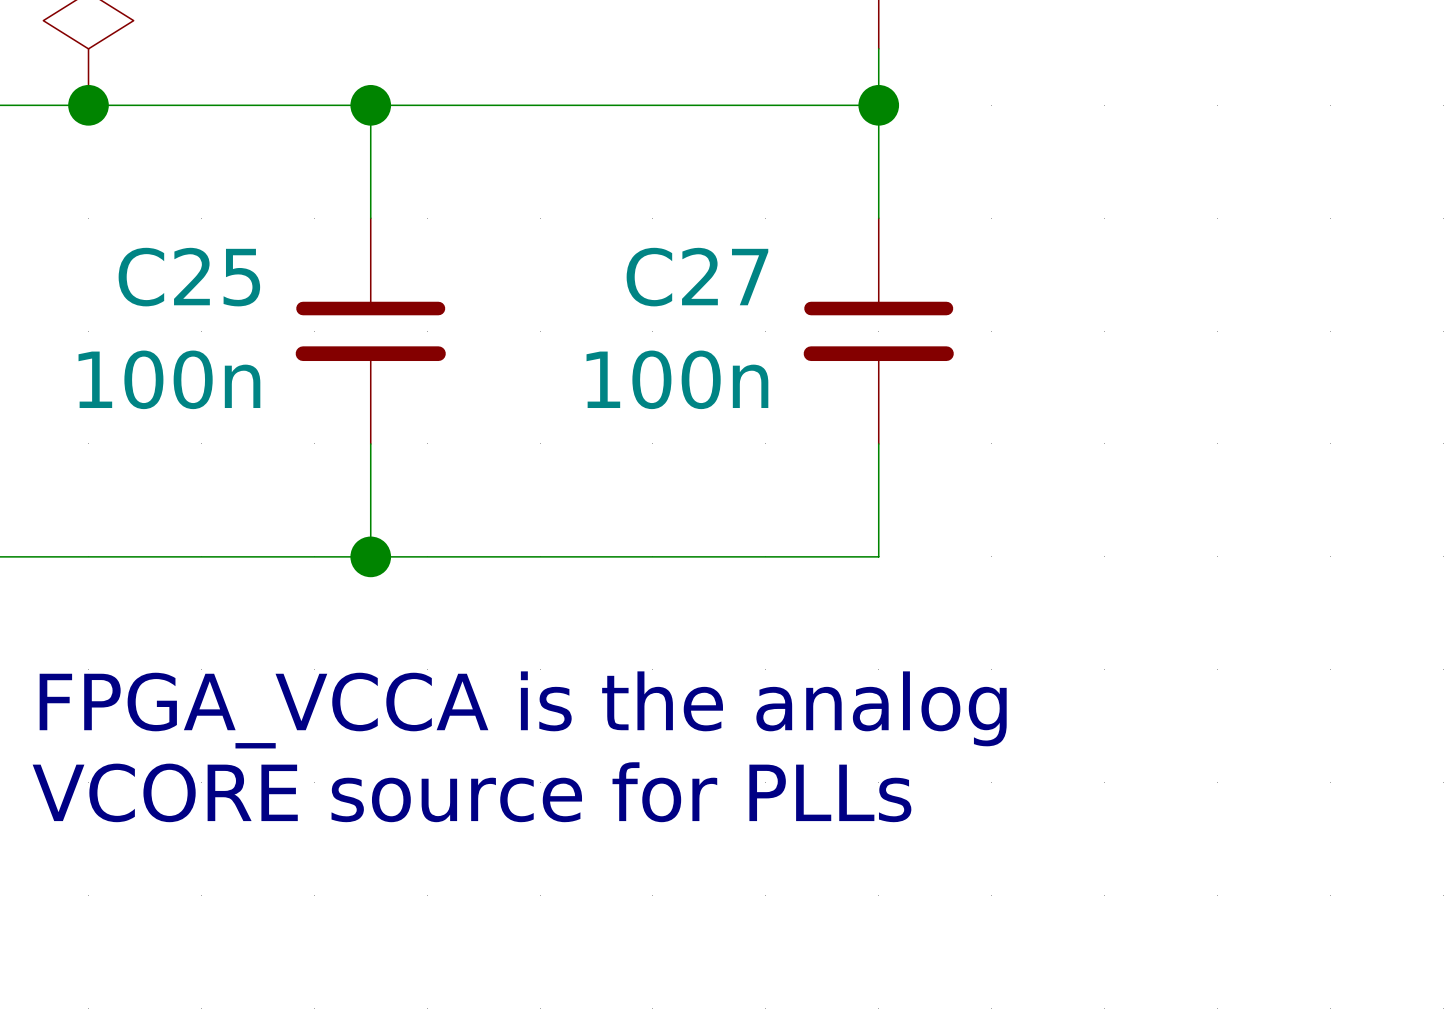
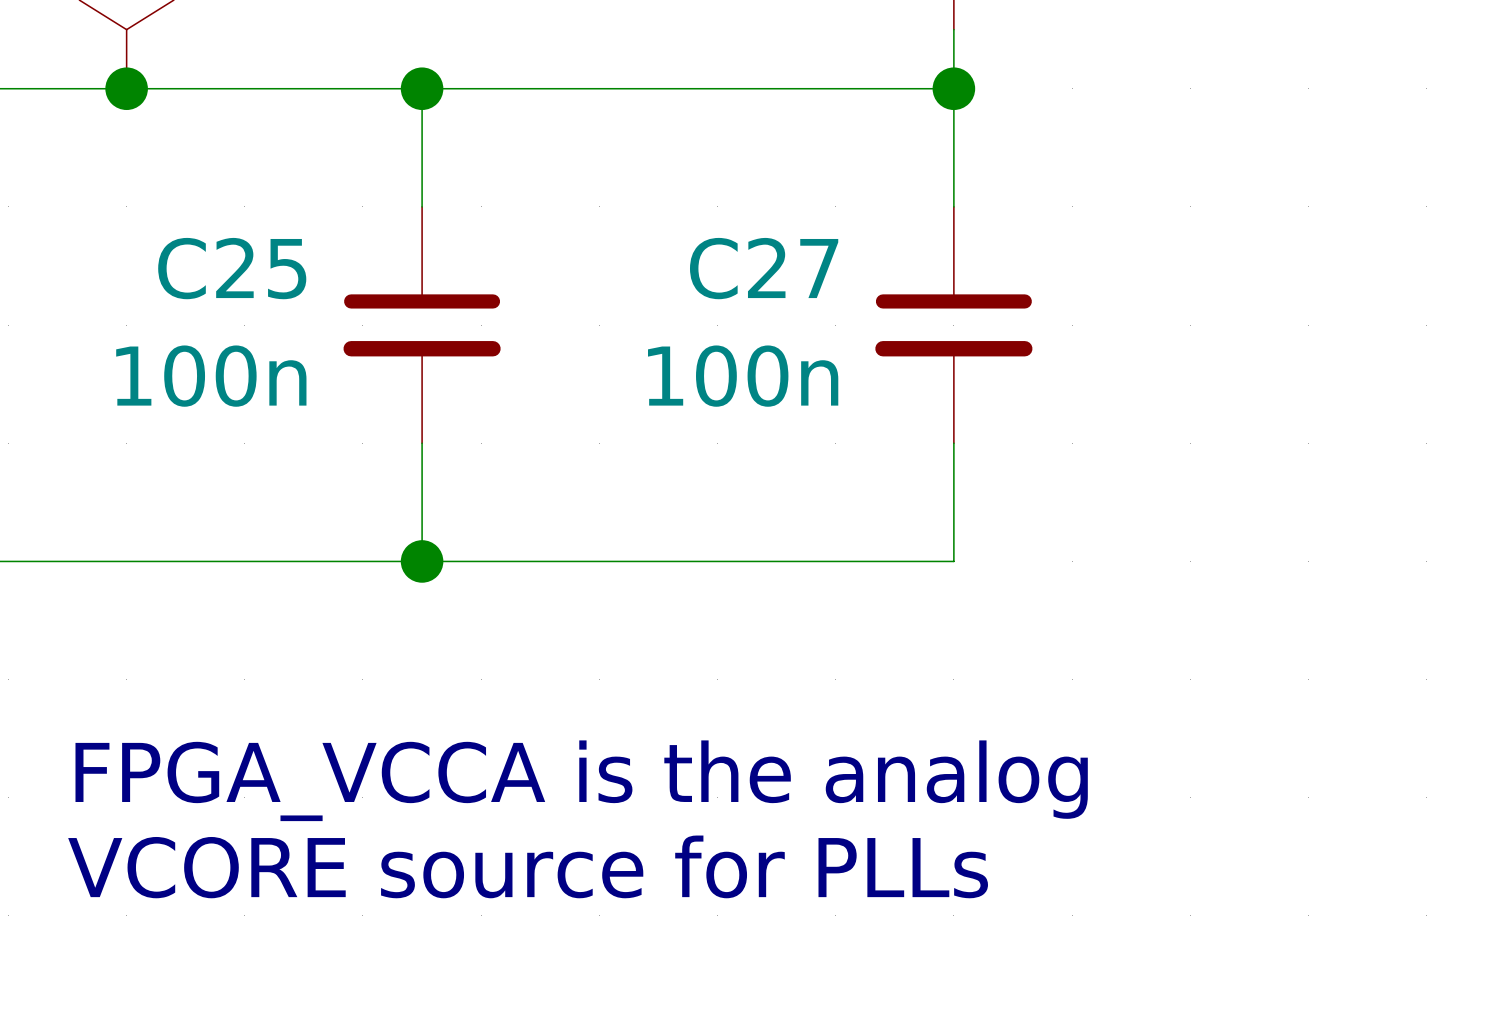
text position: FPGA_VCCA is the analog (523, 709) -> FPGA_VCCA is the analog (581, 780)
text position: VCORE source for PLLs (472, 792) -> VCORE source for PLLs (528, 866)

